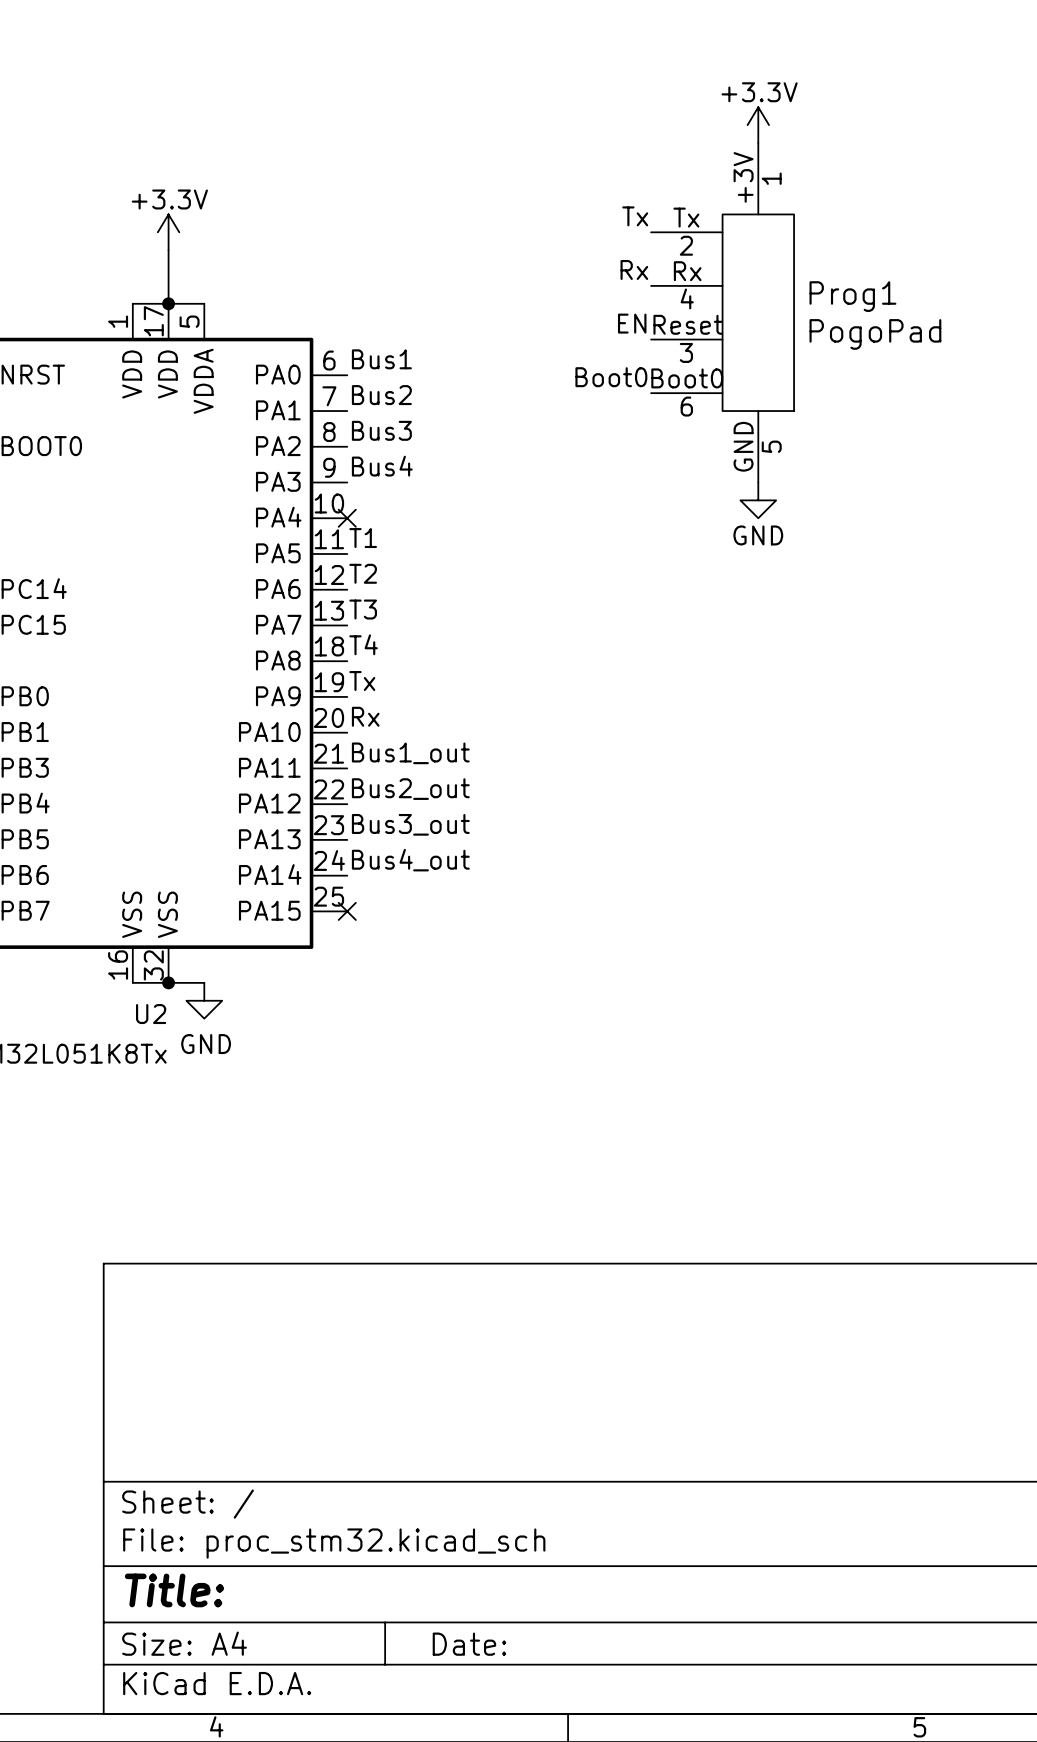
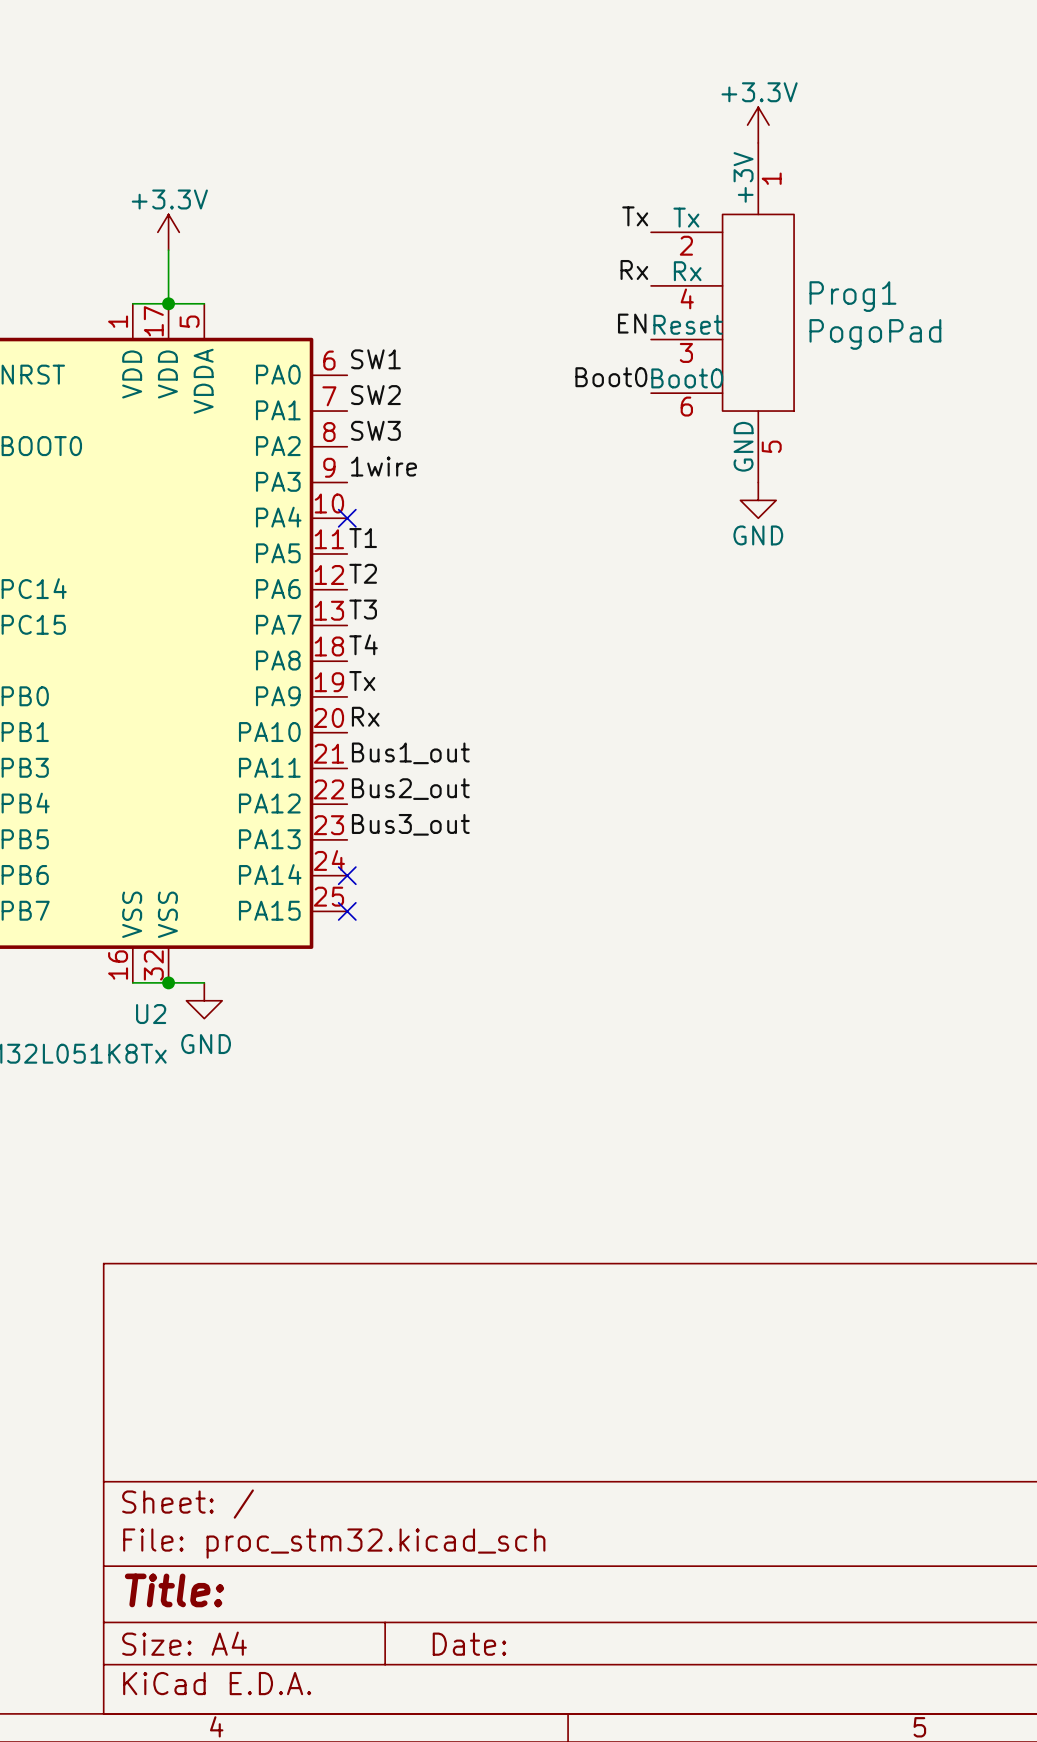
label: Bus1 (381, 359) -> SW1 (375, 359)
label: Bus2 (381, 395) -> SW2 (375, 395)
label: Bus3 (381, 430) -> SW3 (375, 430)
label: Bus4 (382, 466) -> 1wire (384, 466)
label: Bus4_out (410, 860) -> none
no-connect mark: none -> (347, 875)

